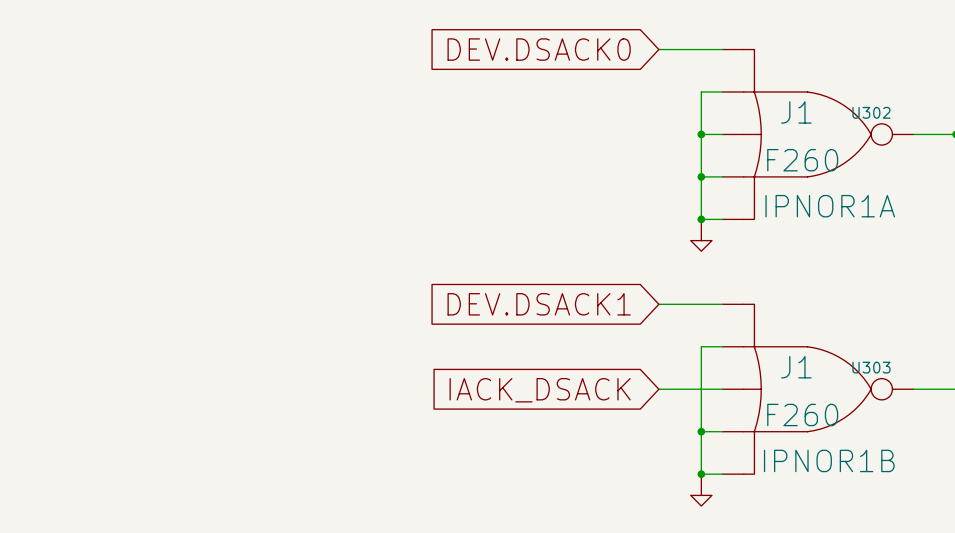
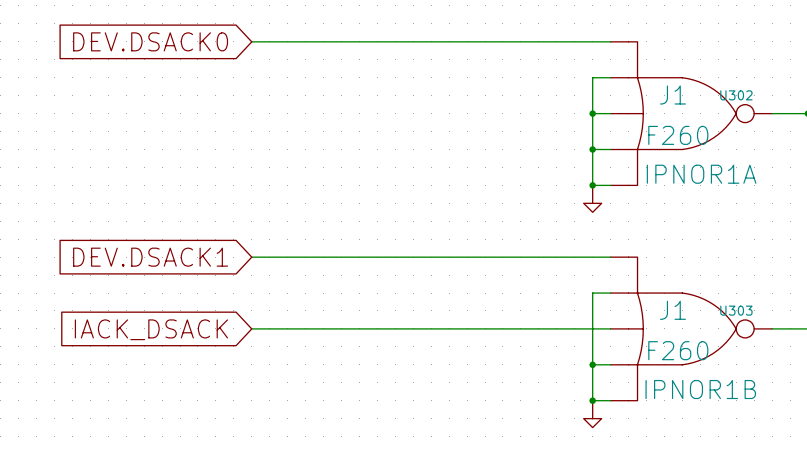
global label: none -> DEV.DSACK0 (150, 41)
wire: none -> (251, 41) (556, 41)
global label: DEV.DSACK0 (539, 49) -> none
global label: none -> DEV.DSACK1 (150, 257)
wire: none -> (251, 257) (556, 257)
global label: DEV.DSACK1 (539, 304) -> none
wire: none -> (251, 328) (556, 328)
global label: none -> IACK_DSACK (151, 329)
global label: IACK_DSACK (540, 390) -> none

